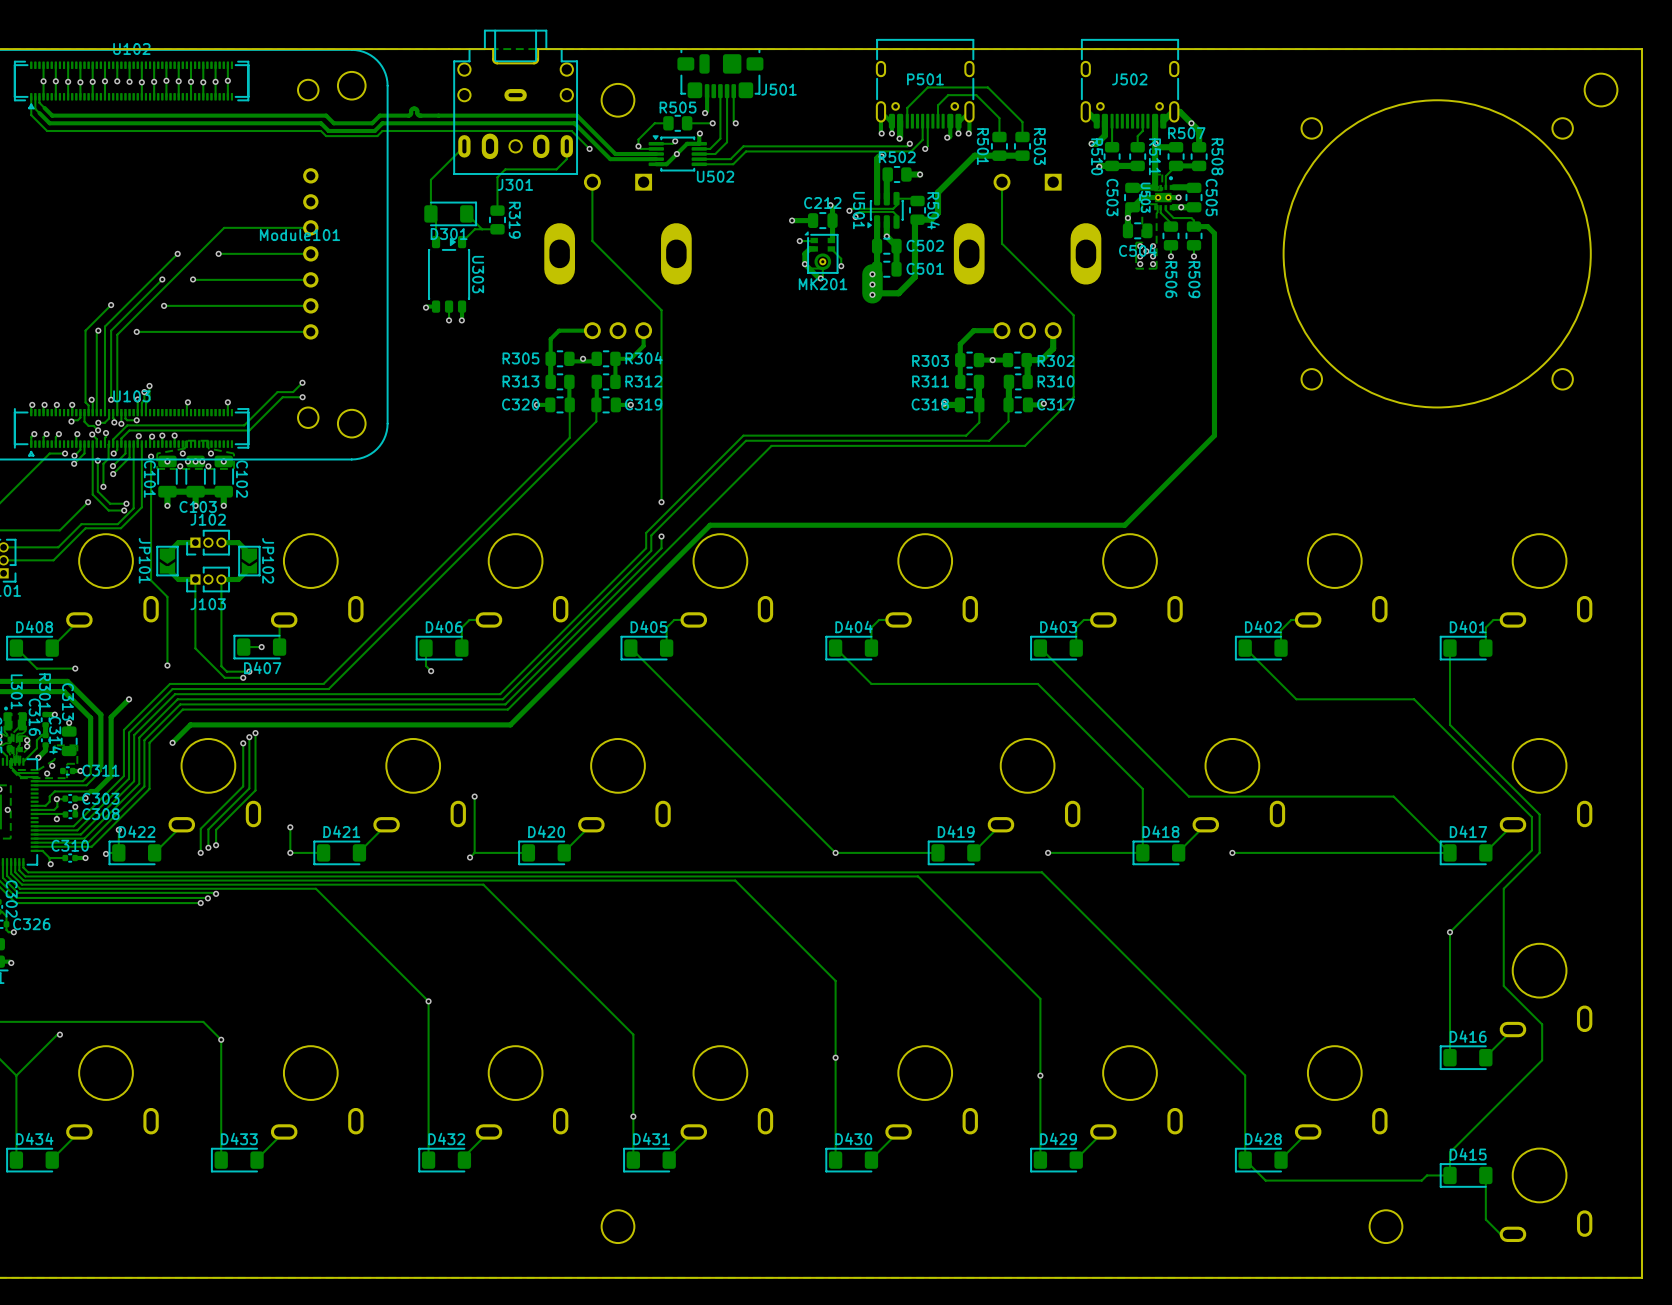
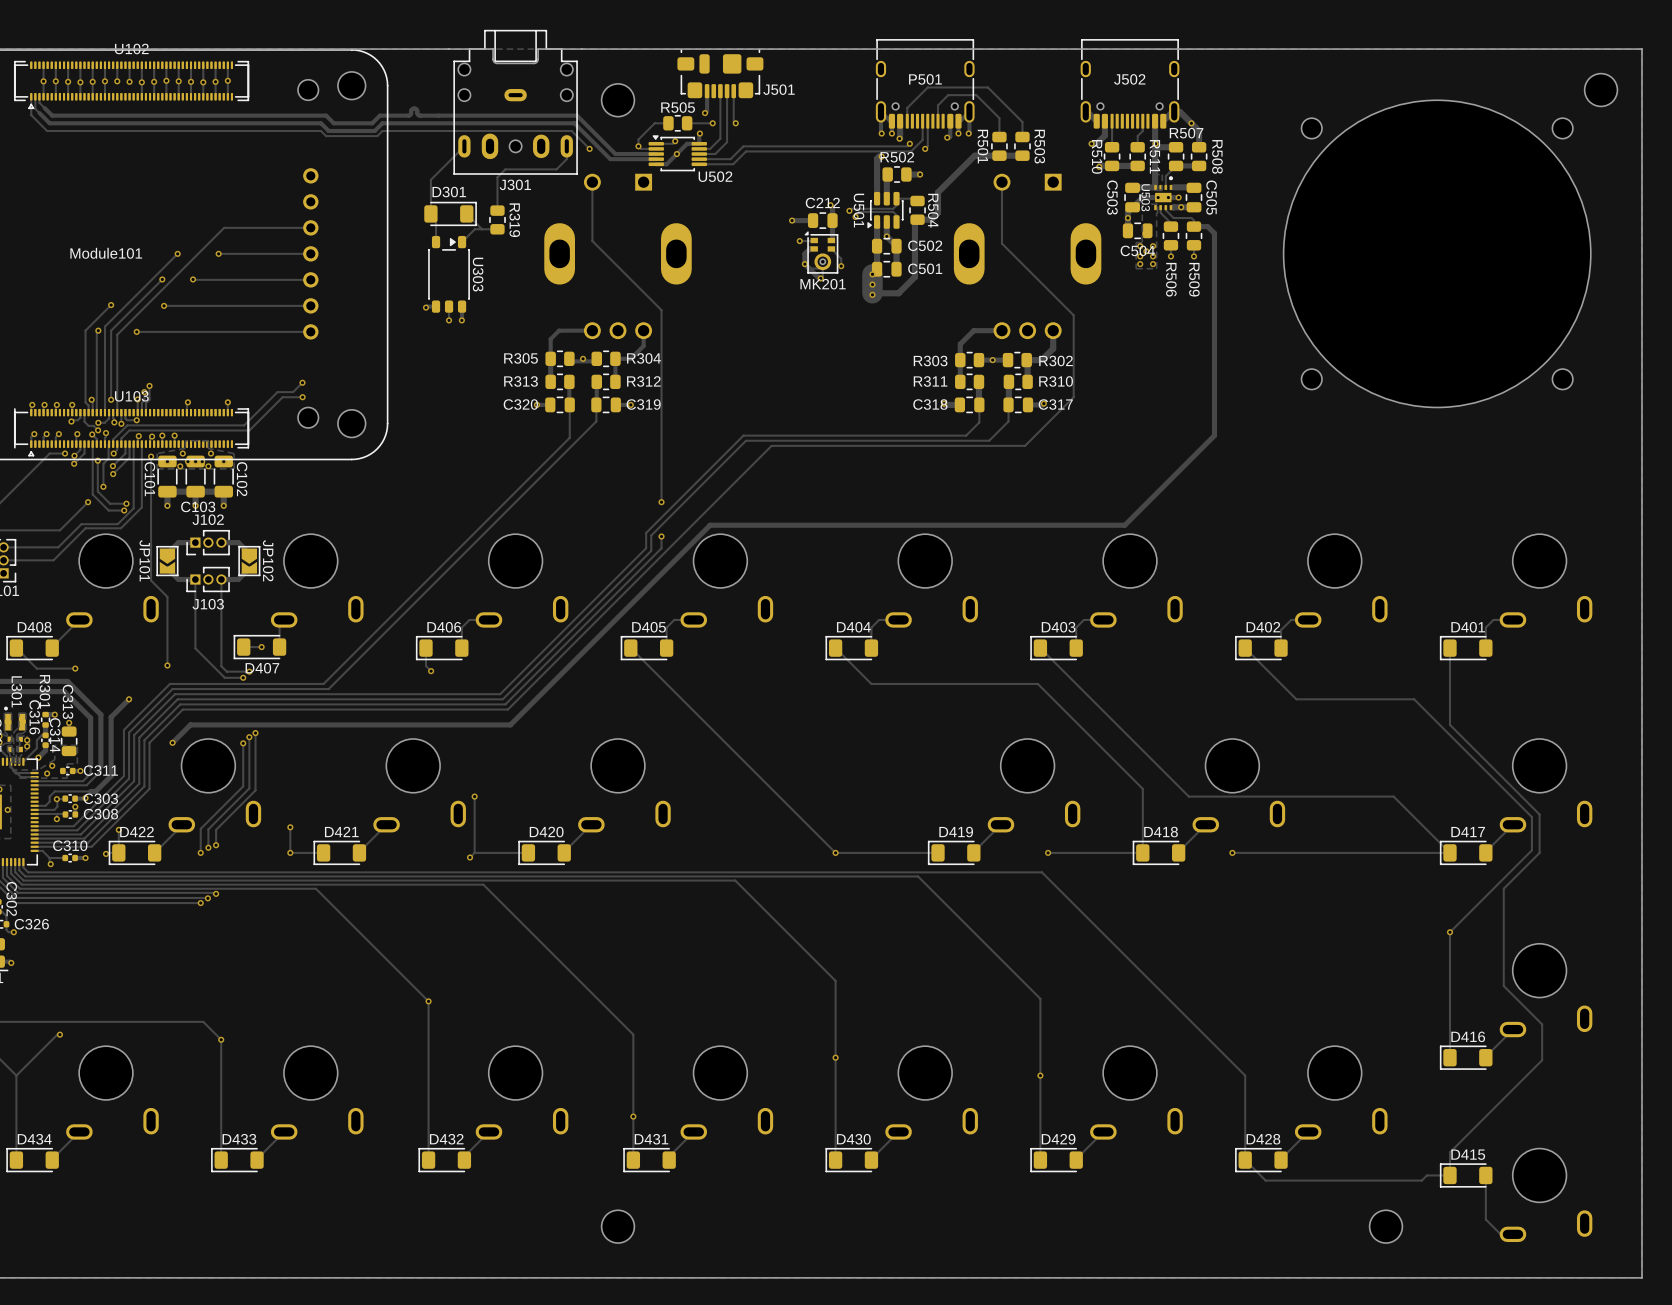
D301 name position: D301 (449, 234) -> D301 (449, 192)
Module101 name position: Module101 (299, 235) -> Module101 (106, 253)

